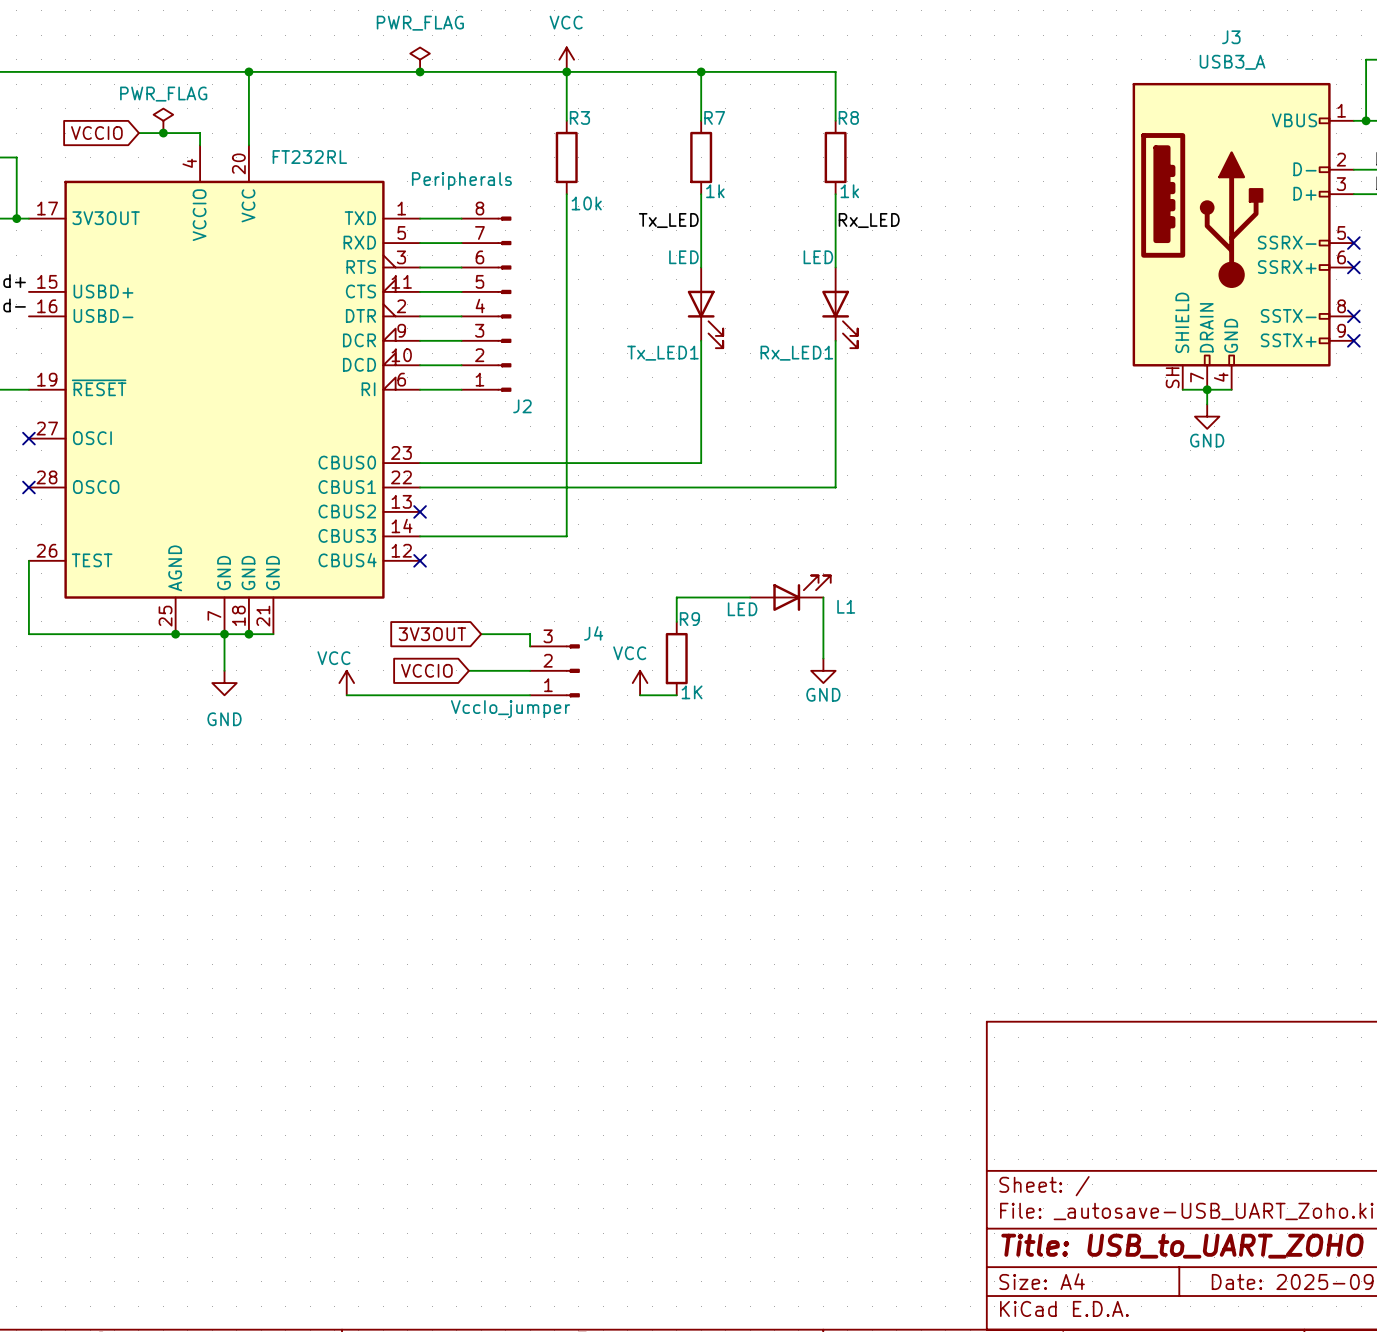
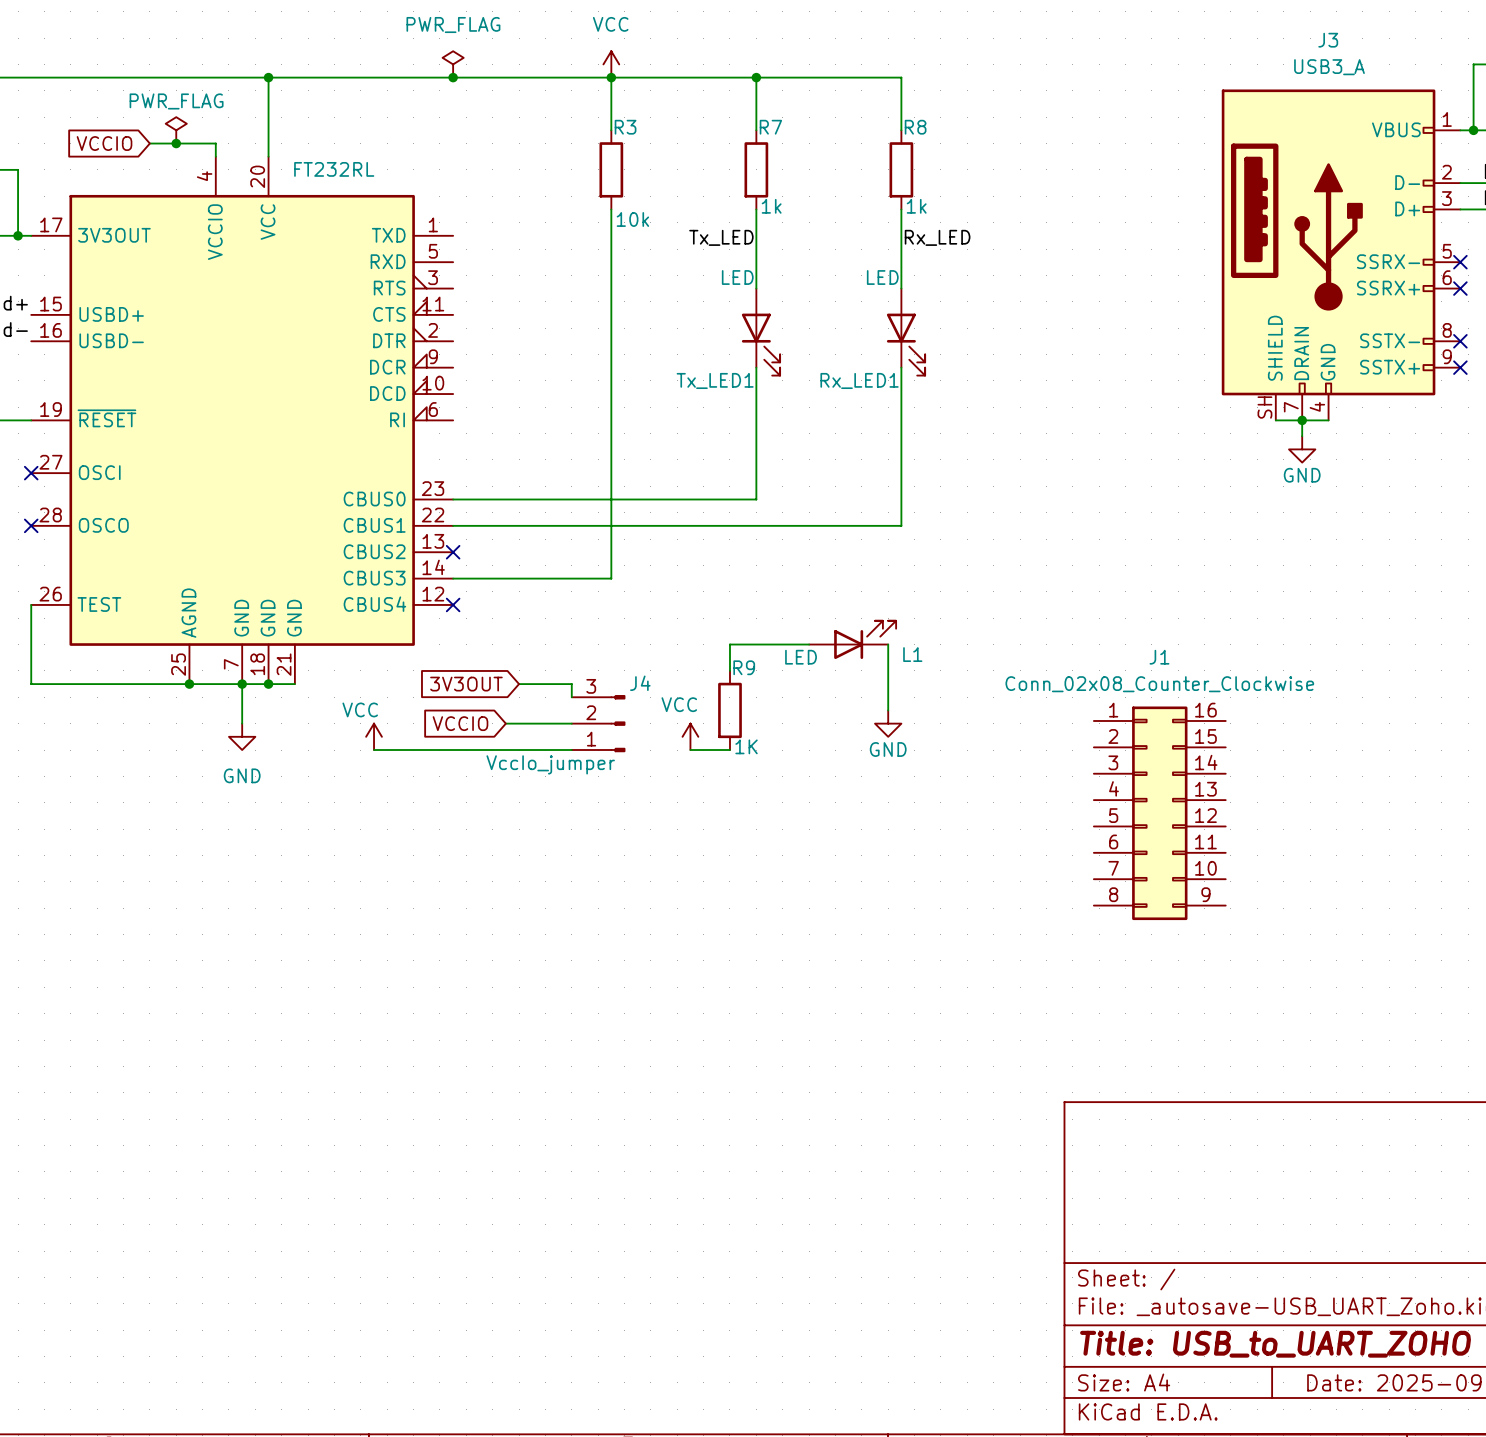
wire: (420, 218) (461, 218) -> none
wire: (420, 243) (461, 243) -> none
wire: (420, 267) (461, 267) -> none
wire: (420, 291) (461, 291) -> none
J2: Peripherals (486, 304) -> none
wire: (420, 316) (461, 316) -> none
wire: (420, 340) (461, 340) -> none
wire: (420, 365) (461, 365) -> none
wire: (420, 389) (461, 389) -> none
J1: none -> Conn_02x08_Counter_Clockwise (1159, 813)

